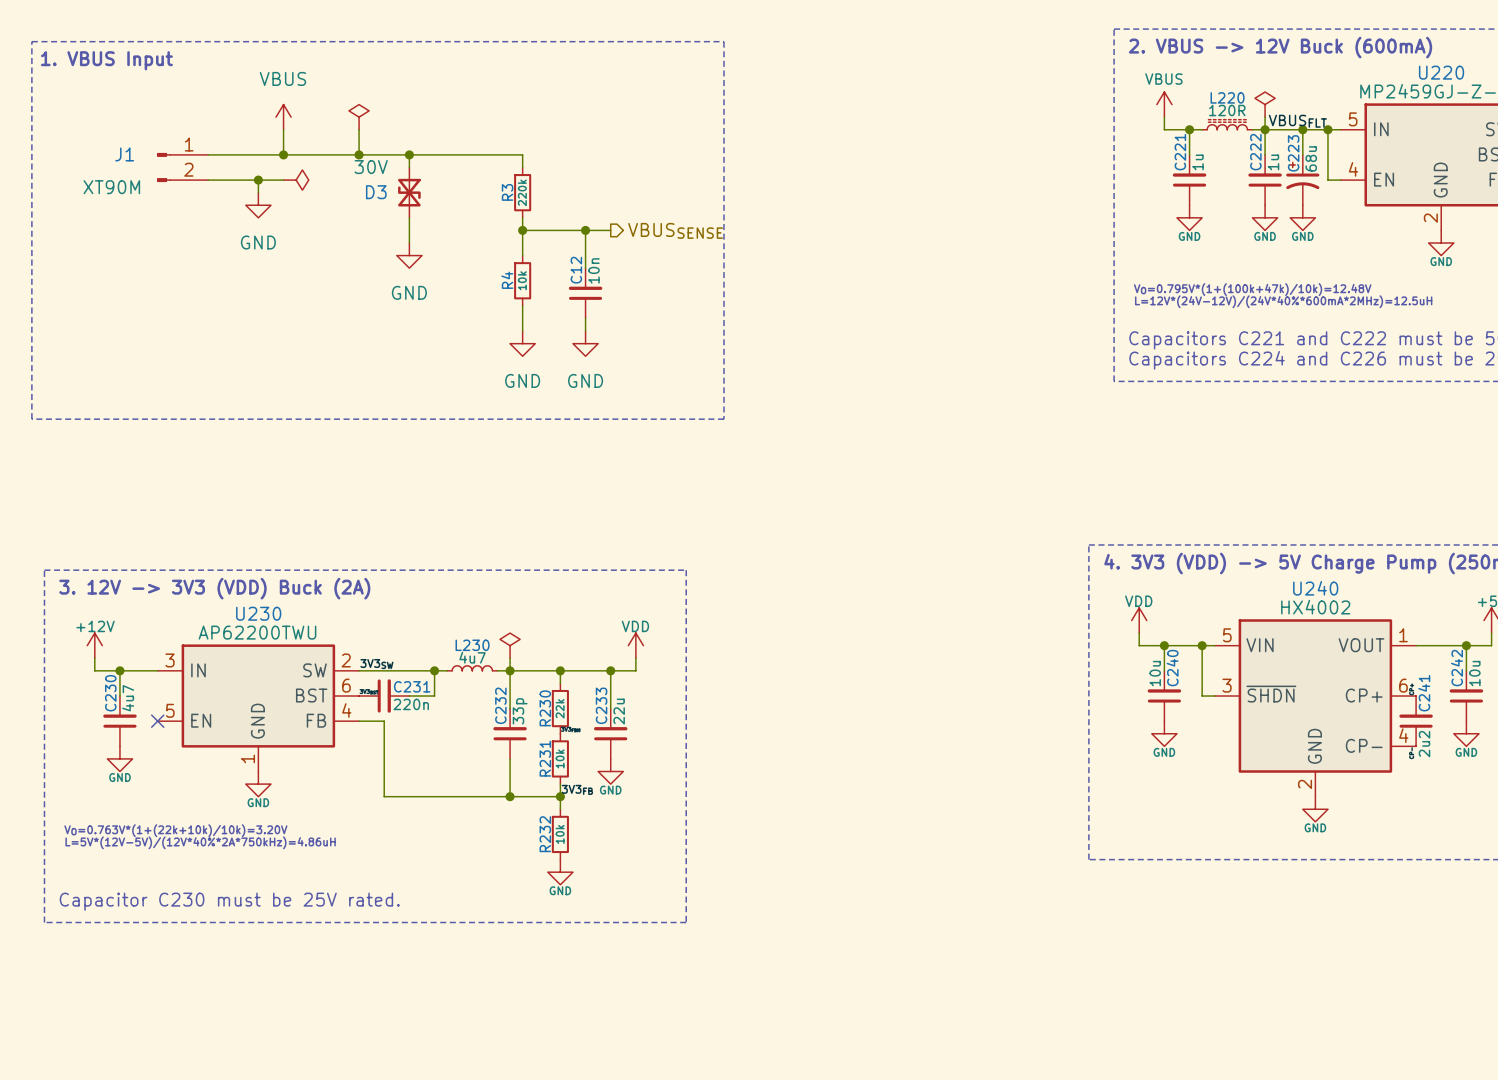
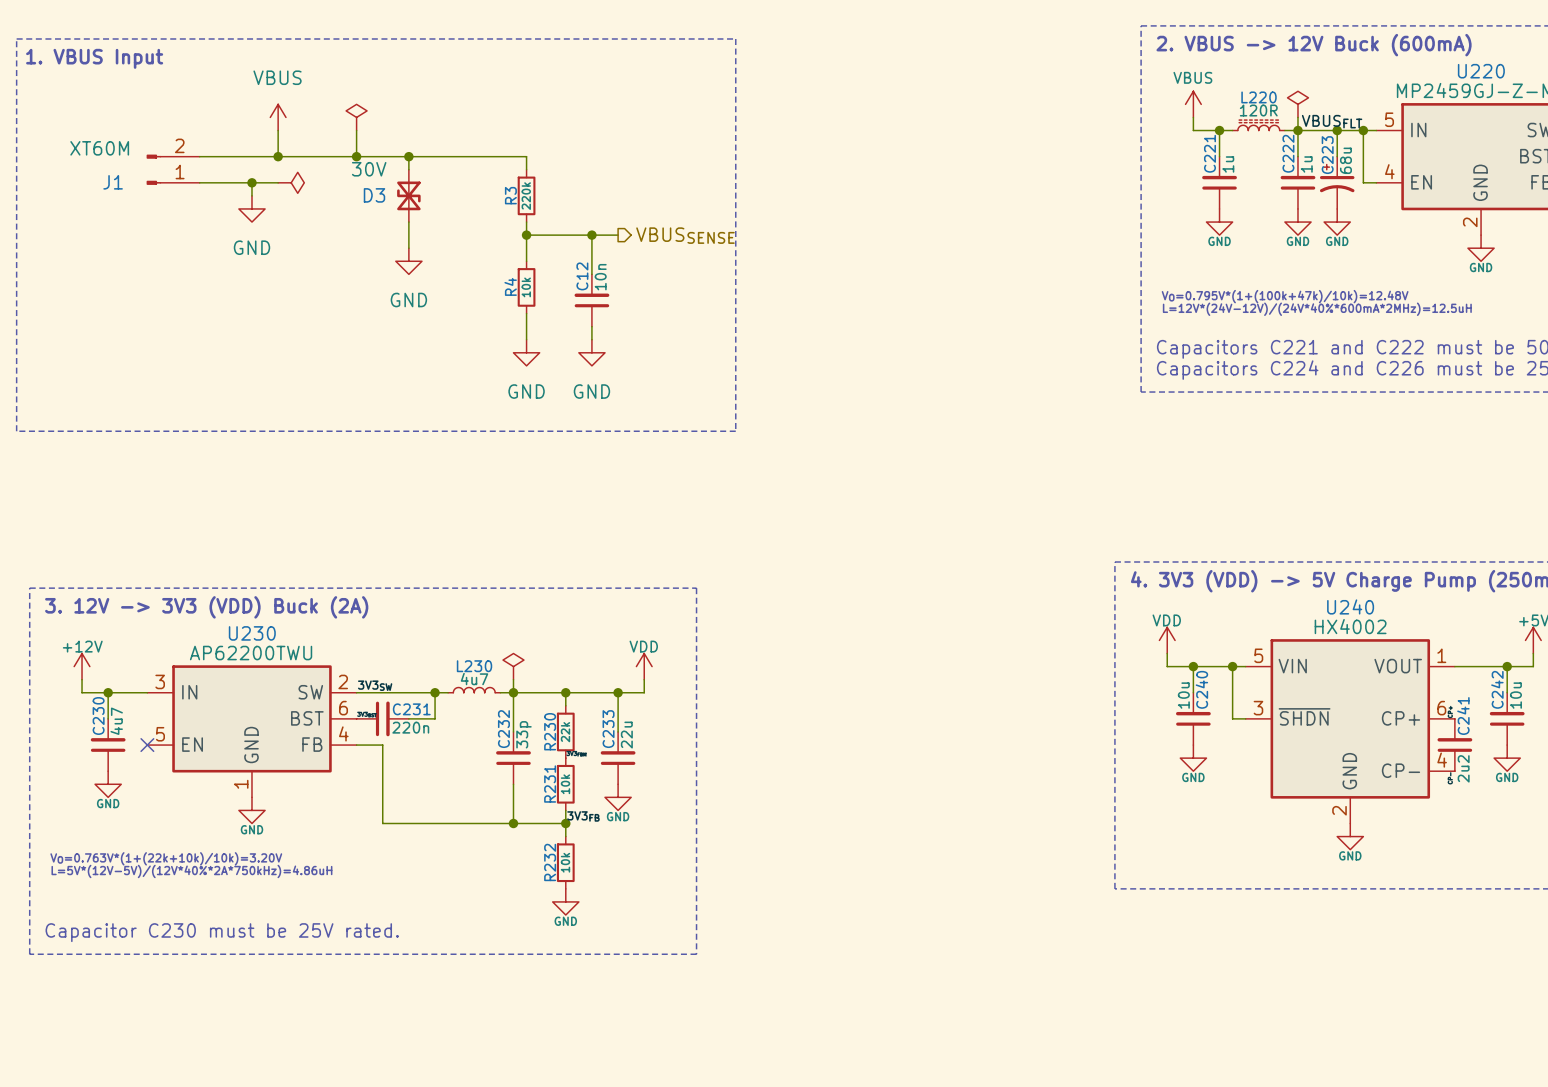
J1 flip: as is (164, 167) -> up-down (153, 169)
J1 value: XT90M (111, 187) -> XT60M (99, 148)

